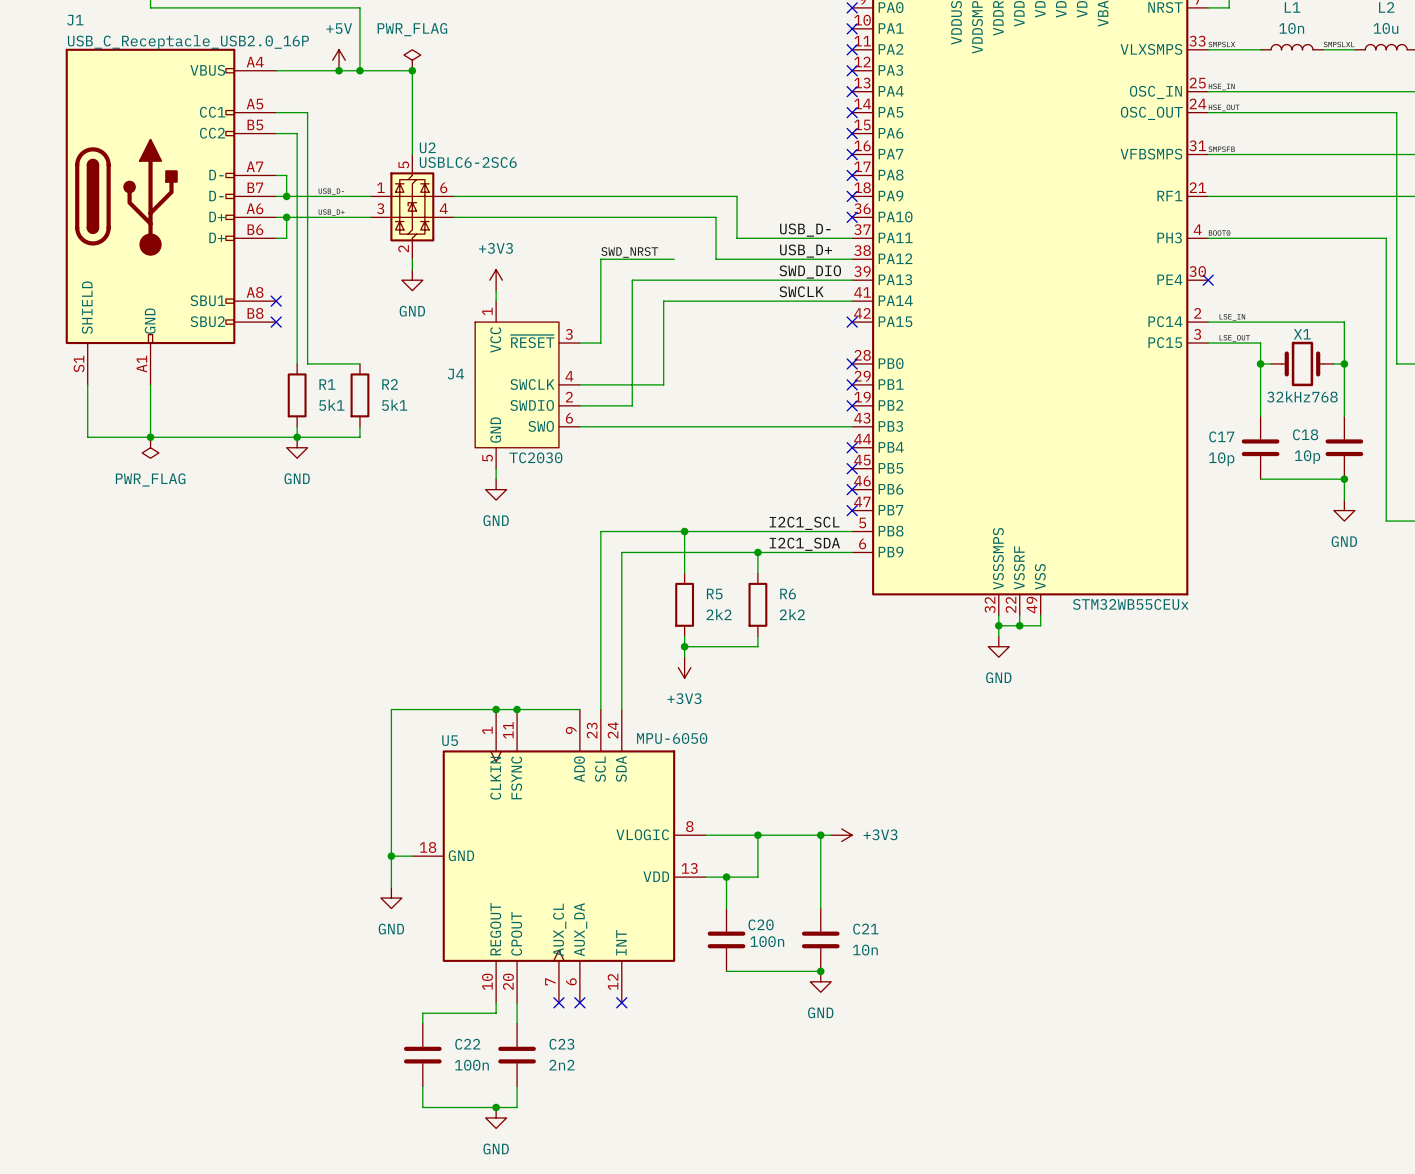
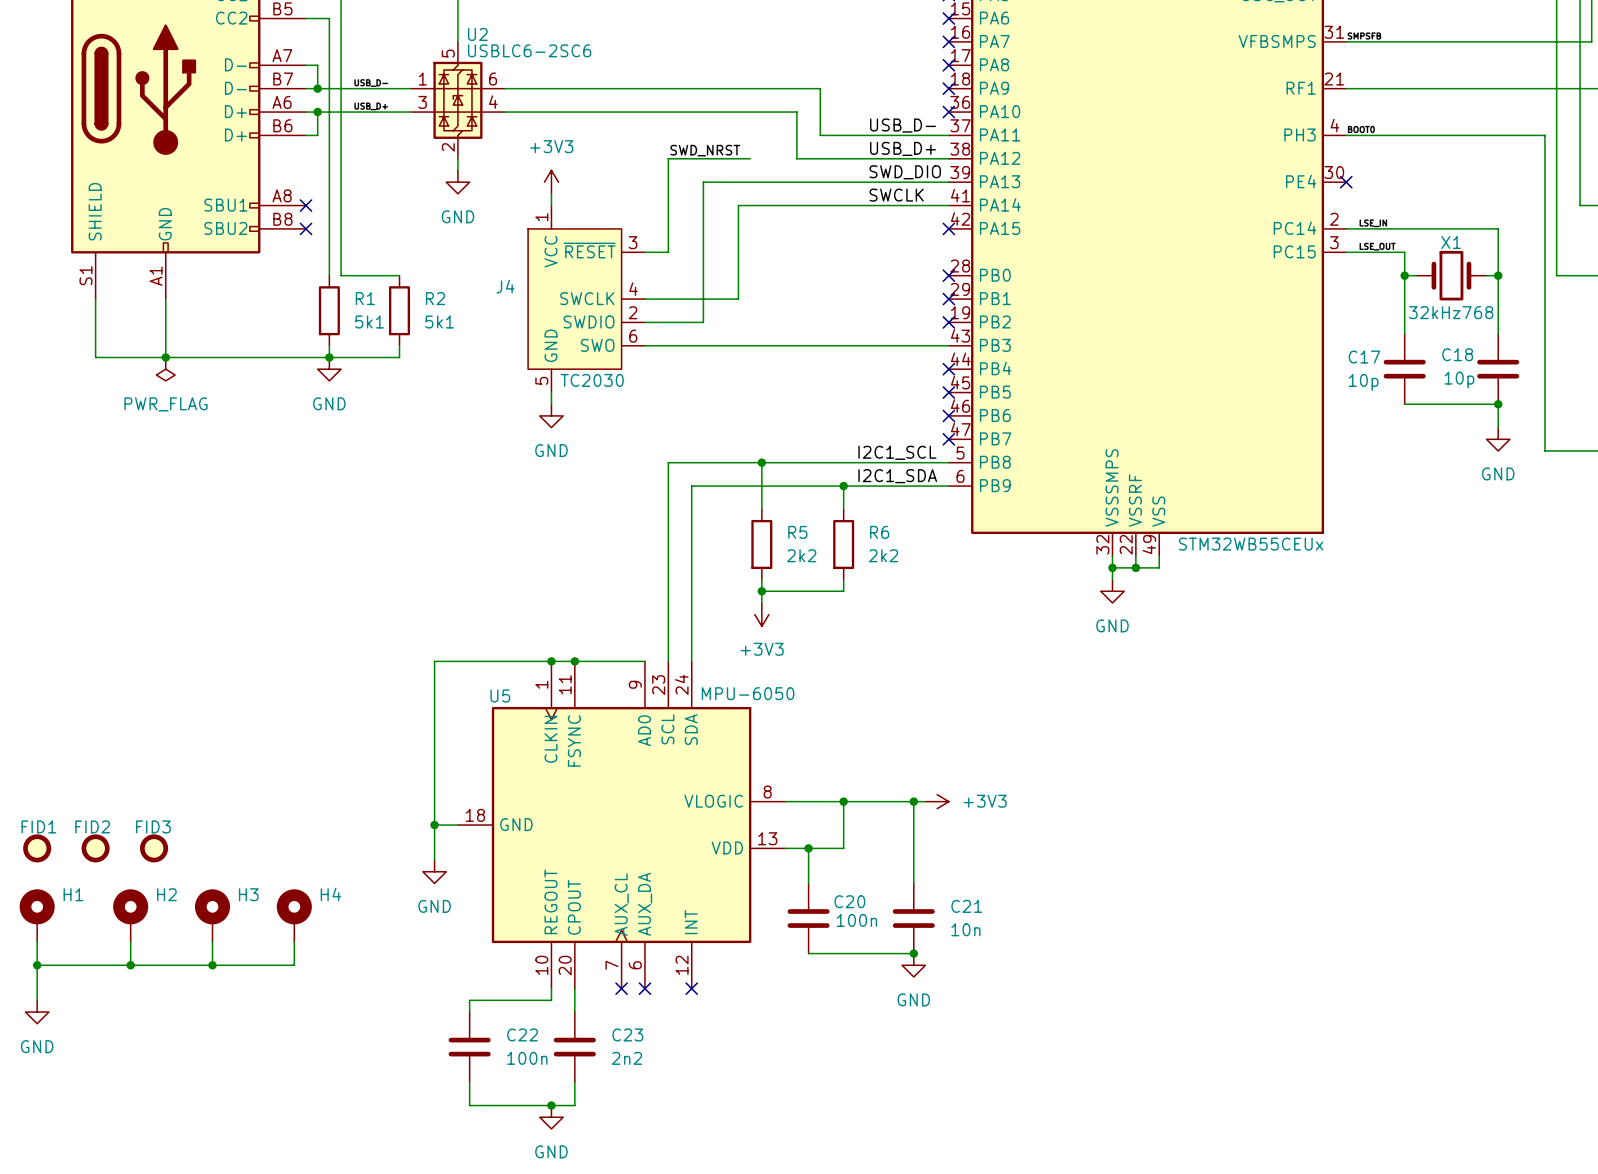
FID1: none -> (37, 848)
FID2: none -> (95, 848)
FID3: none -> (154, 848)
H1: none -> (37, 915)
H2: none -> (130, 915)
H3: none -> (212, 915)
H4: none -> (294, 915)
wire: none -> (37, 941) (37, 1000)
wire: none -> (130, 941) (130, 965)
wire: none -> (212, 941) (212, 965)
wire: none -> (294, 941) (294, 965) (37, 965)
junction: none -> (37, 965)
junction: none -> (130, 965)
junction: none -> (212, 965)
power symbol: none -> GND (37, 1012)

